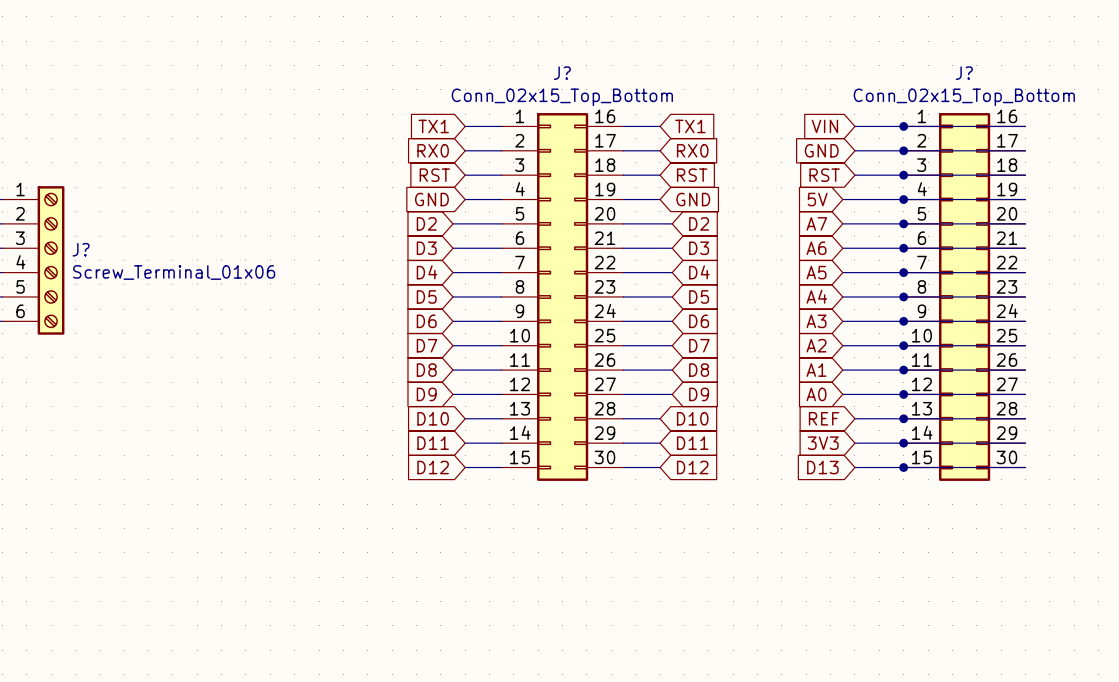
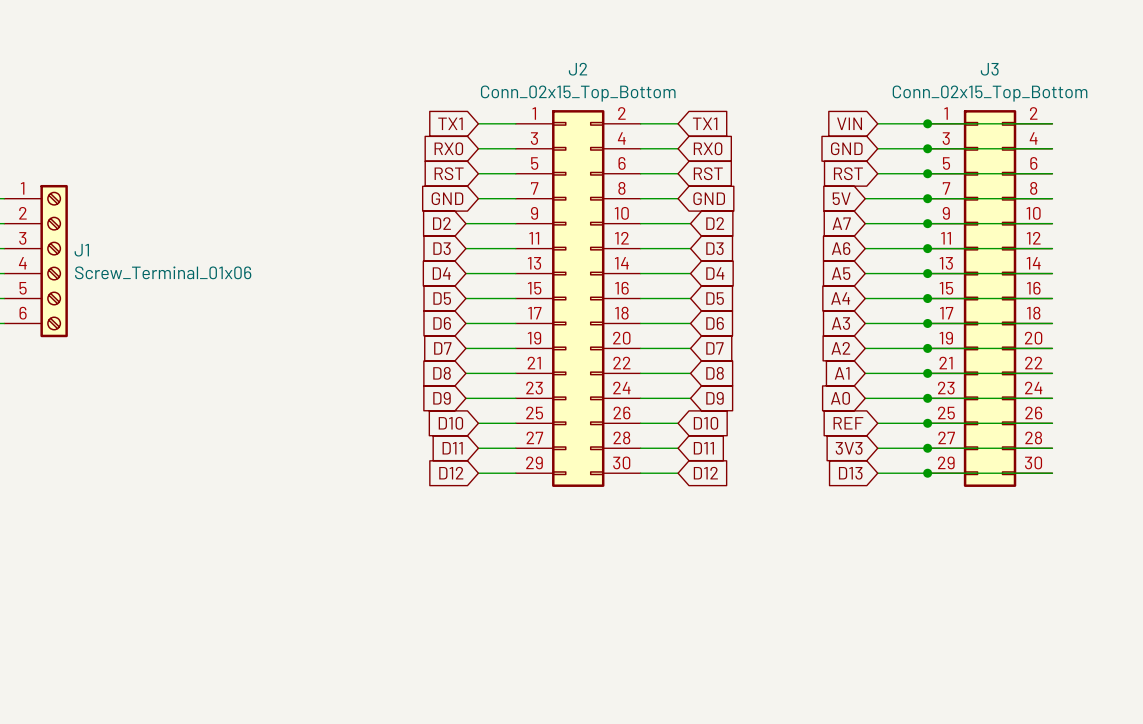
J? name: J? (562, 73) -> J2 (577, 69)
J? name: J? (964, 73) -> J3 (989, 69)
J? symbol: [501, 113, 624, 481] -> [515, 110, 641, 487]
J? symbol: [903, 113, 1026, 481] -> [927, 110, 1053, 487]
J? name: J? (81, 249) -> J1 (81, 250)

